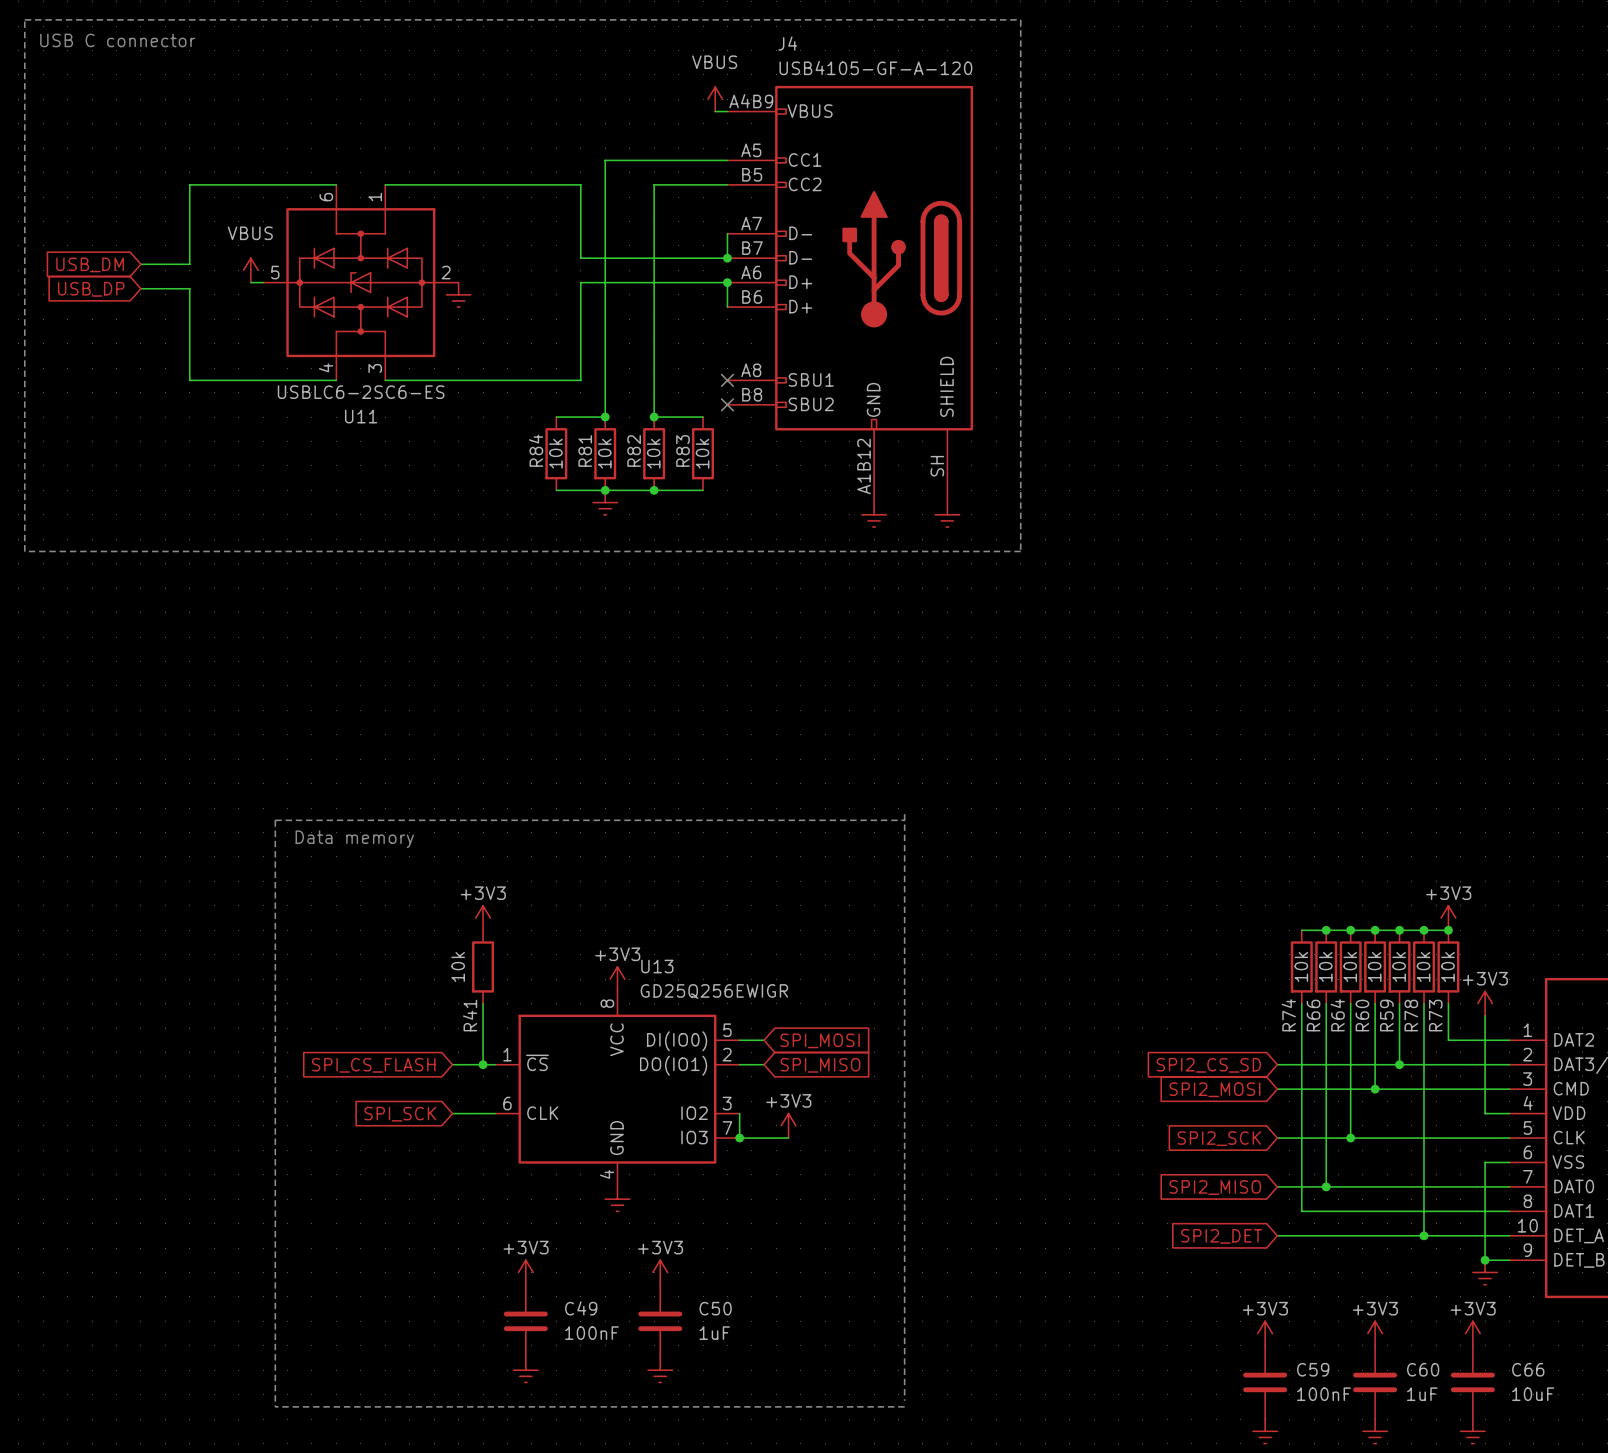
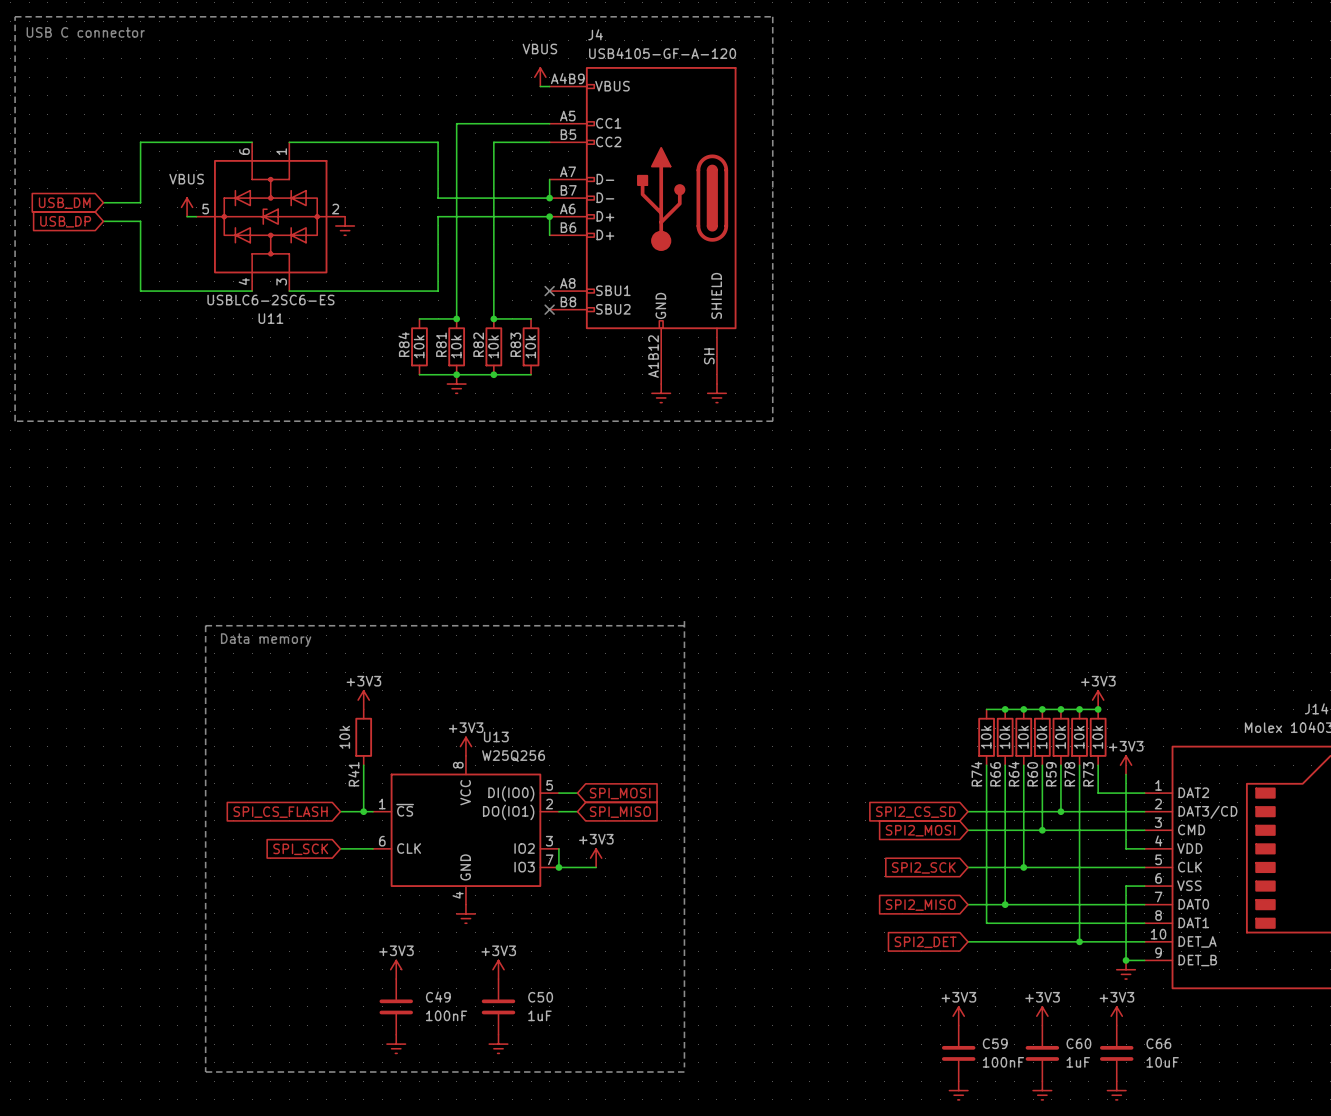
U13 value: GD25Q256EWIGR (714, 991) -> W25Q256 (513, 756)

